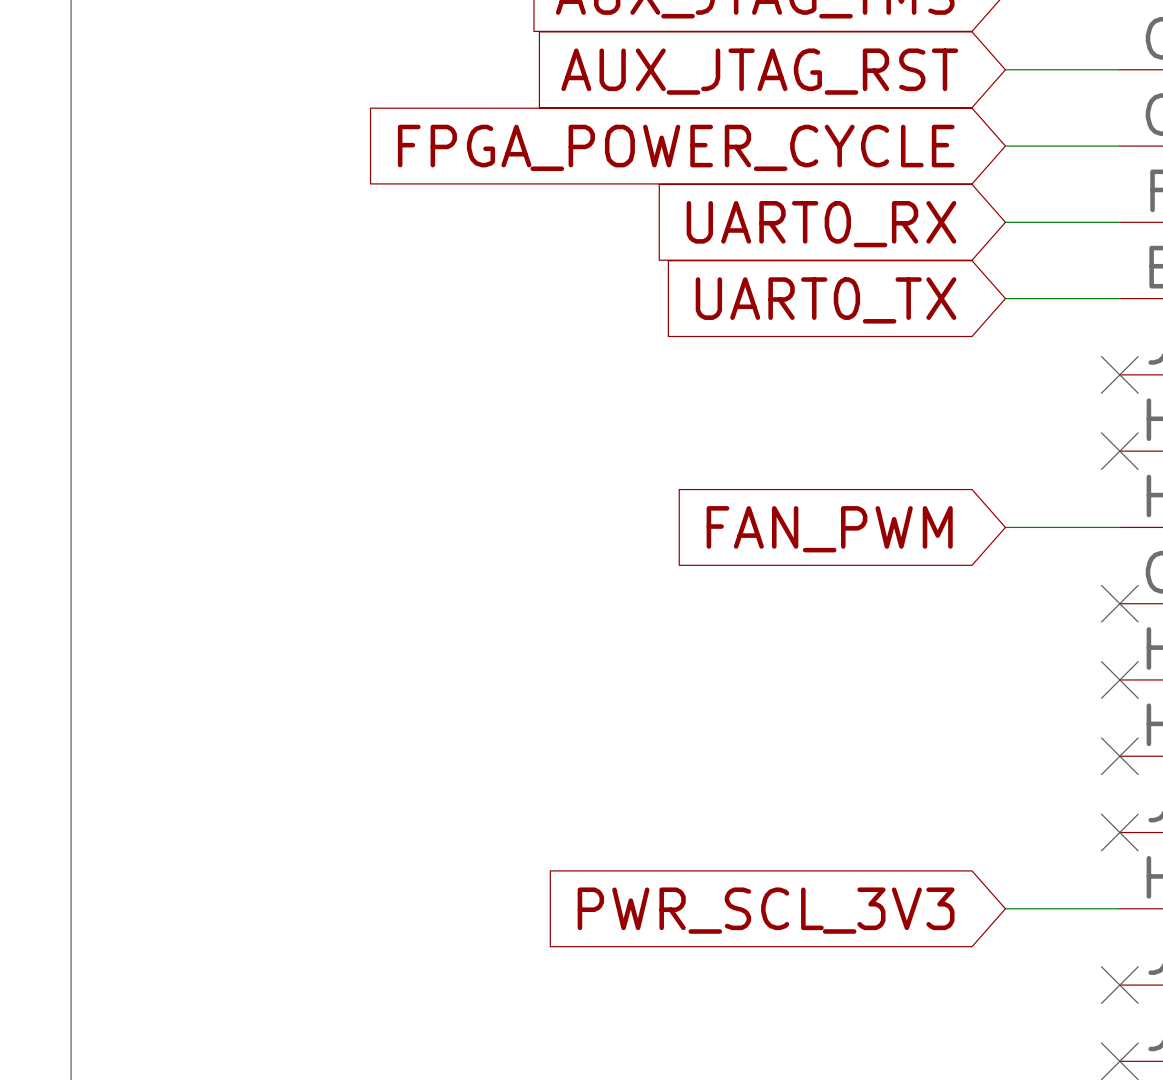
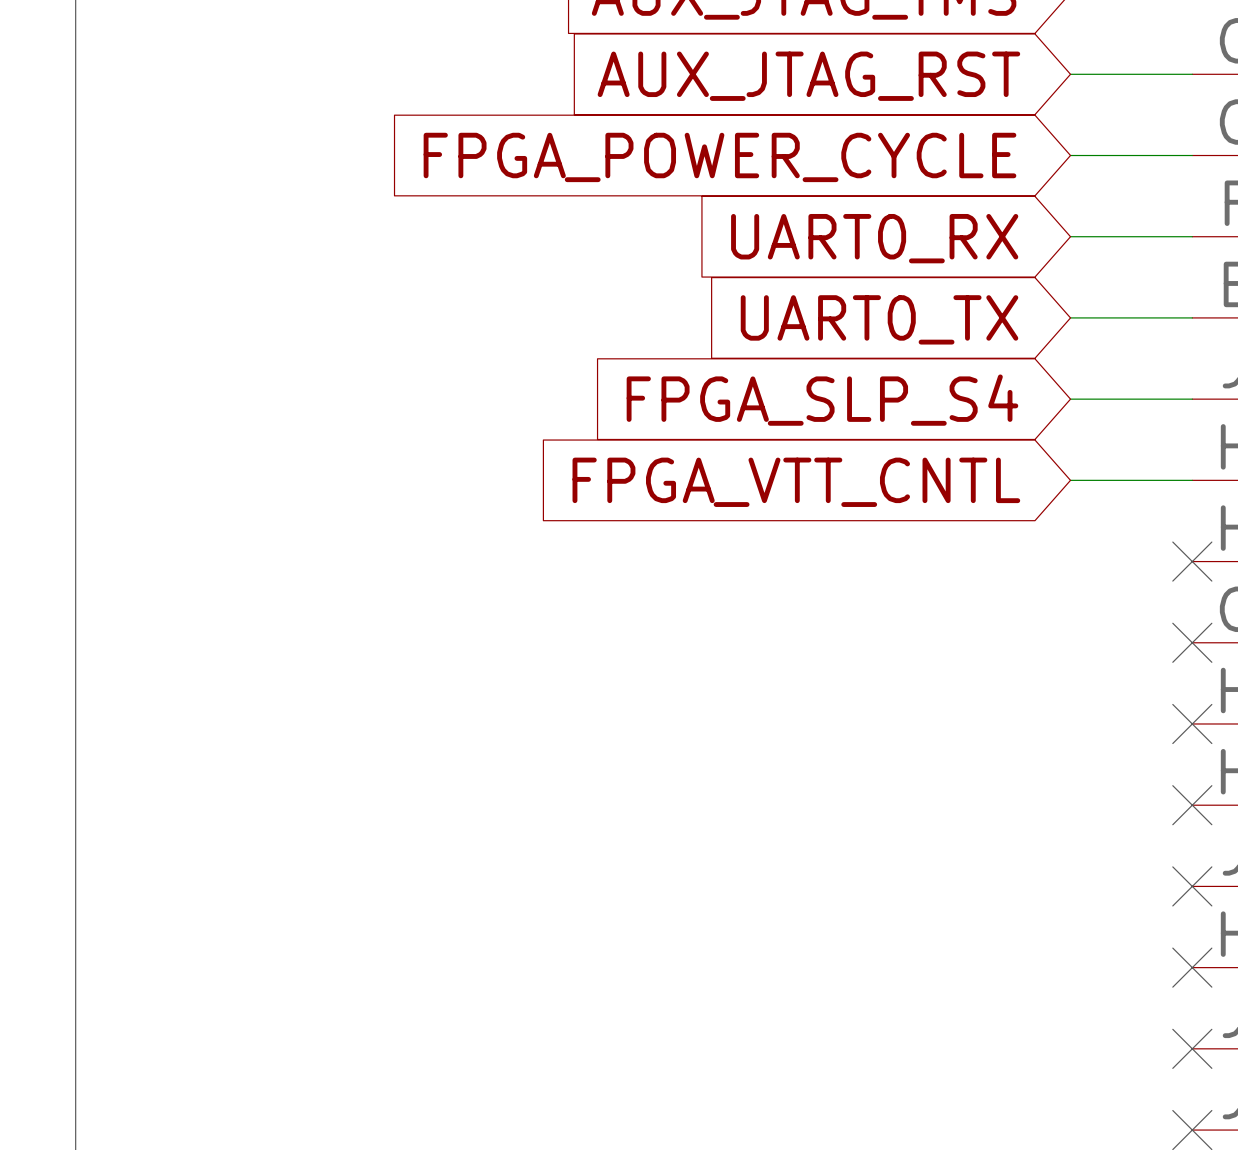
no-connect mark: (1119, 374) -> none
global label: none -> FPGA_SLP_S4 (822, 400)
no-connect mark: (1119, 451) -> none
global label: none -> FPGA_VTT_CNTL (796, 482)
wire: (1005, 527) (1119, 527) -> (1070, 480) (1192, 480)
no-connect mark: none -> (1192, 561)
global label: FAN_PWM (829, 529) -> none
wire: (1005, 908) (1119, 908) -> (1070, 399) (1192, 399)
no-connect mark: none -> (1192, 967)
global label: PWR_SCL_3V3 (766, 910) -> none

